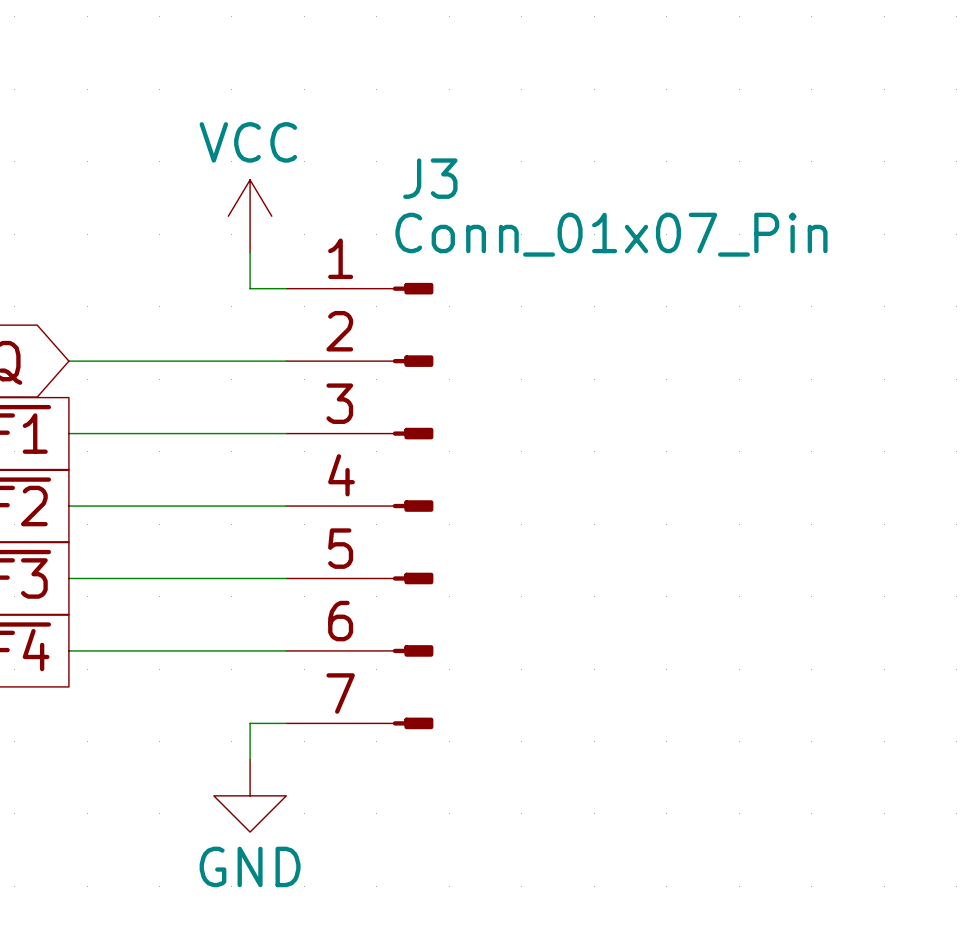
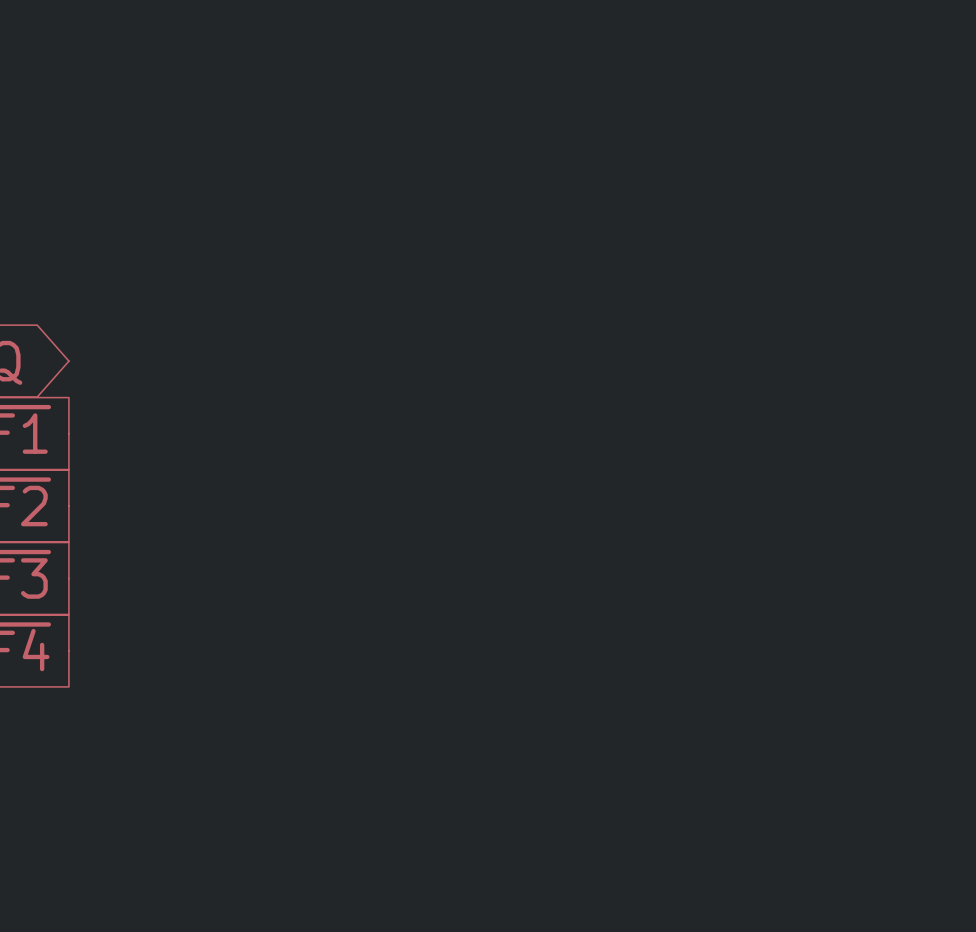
power symbol: VCC (250, 216) -> none
wire: (250, 252) (250, 288) (286, 288) -> none
wire: (68, 361) (286, 361) -> none
wire: (68, 433) (286, 433) -> none
wire: (68, 506) (286, 506) -> none
J3: Conn_01x07_Pin (359, 506) -> none
wire: (68, 578) (286, 578) -> none
wire: (68, 650) (286, 650) -> none
wire: (286, 723) (250, 723) (250, 759) -> none
power symbol: GND (250, 795) -> none

